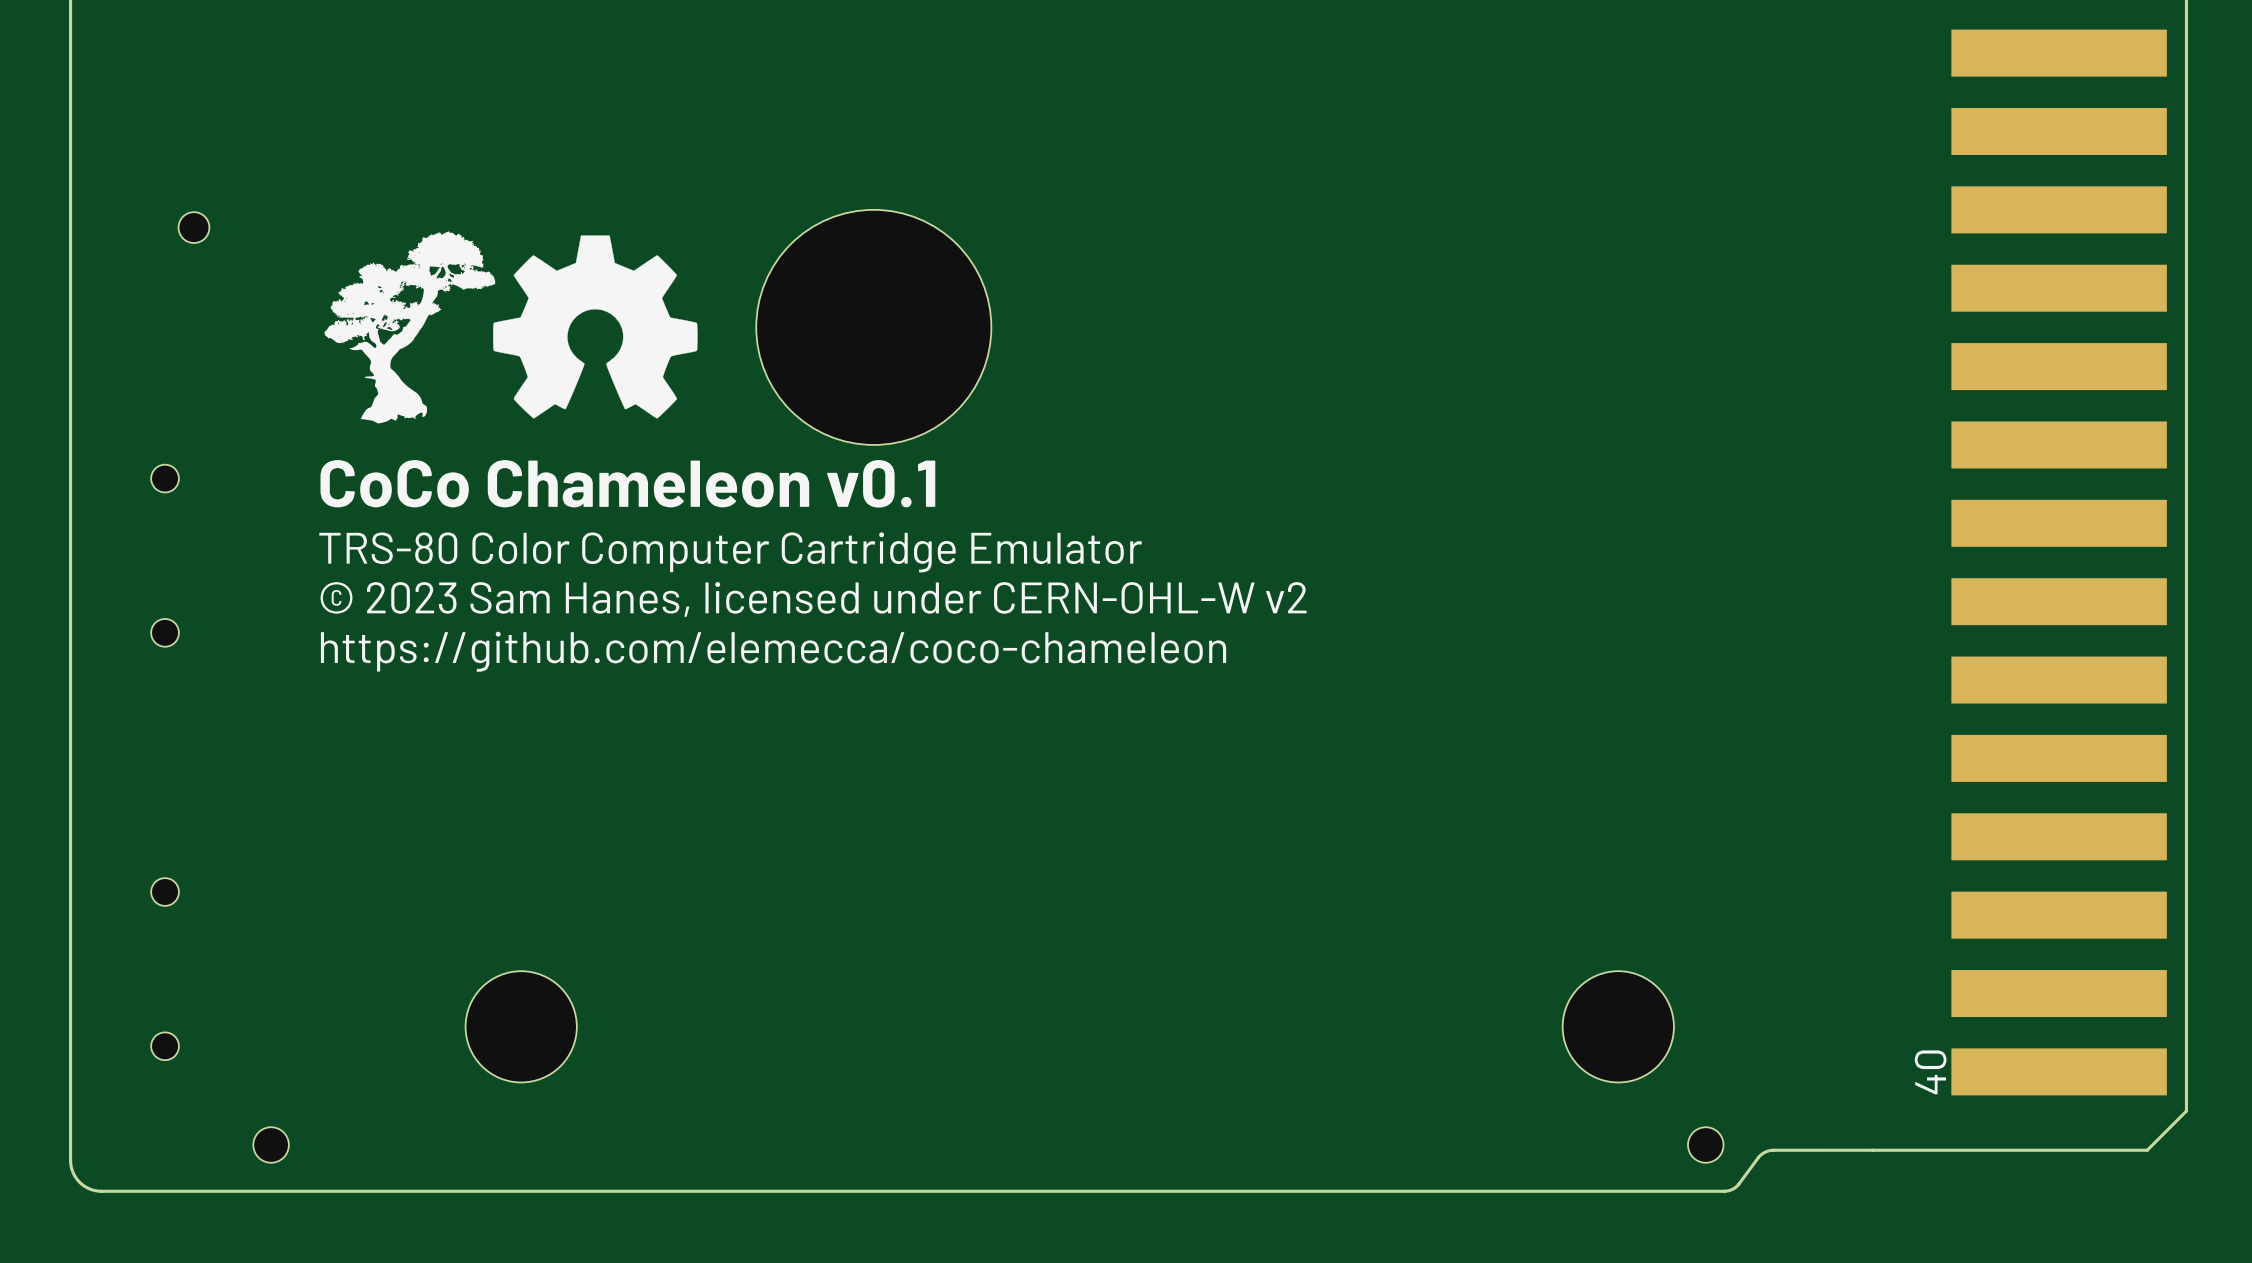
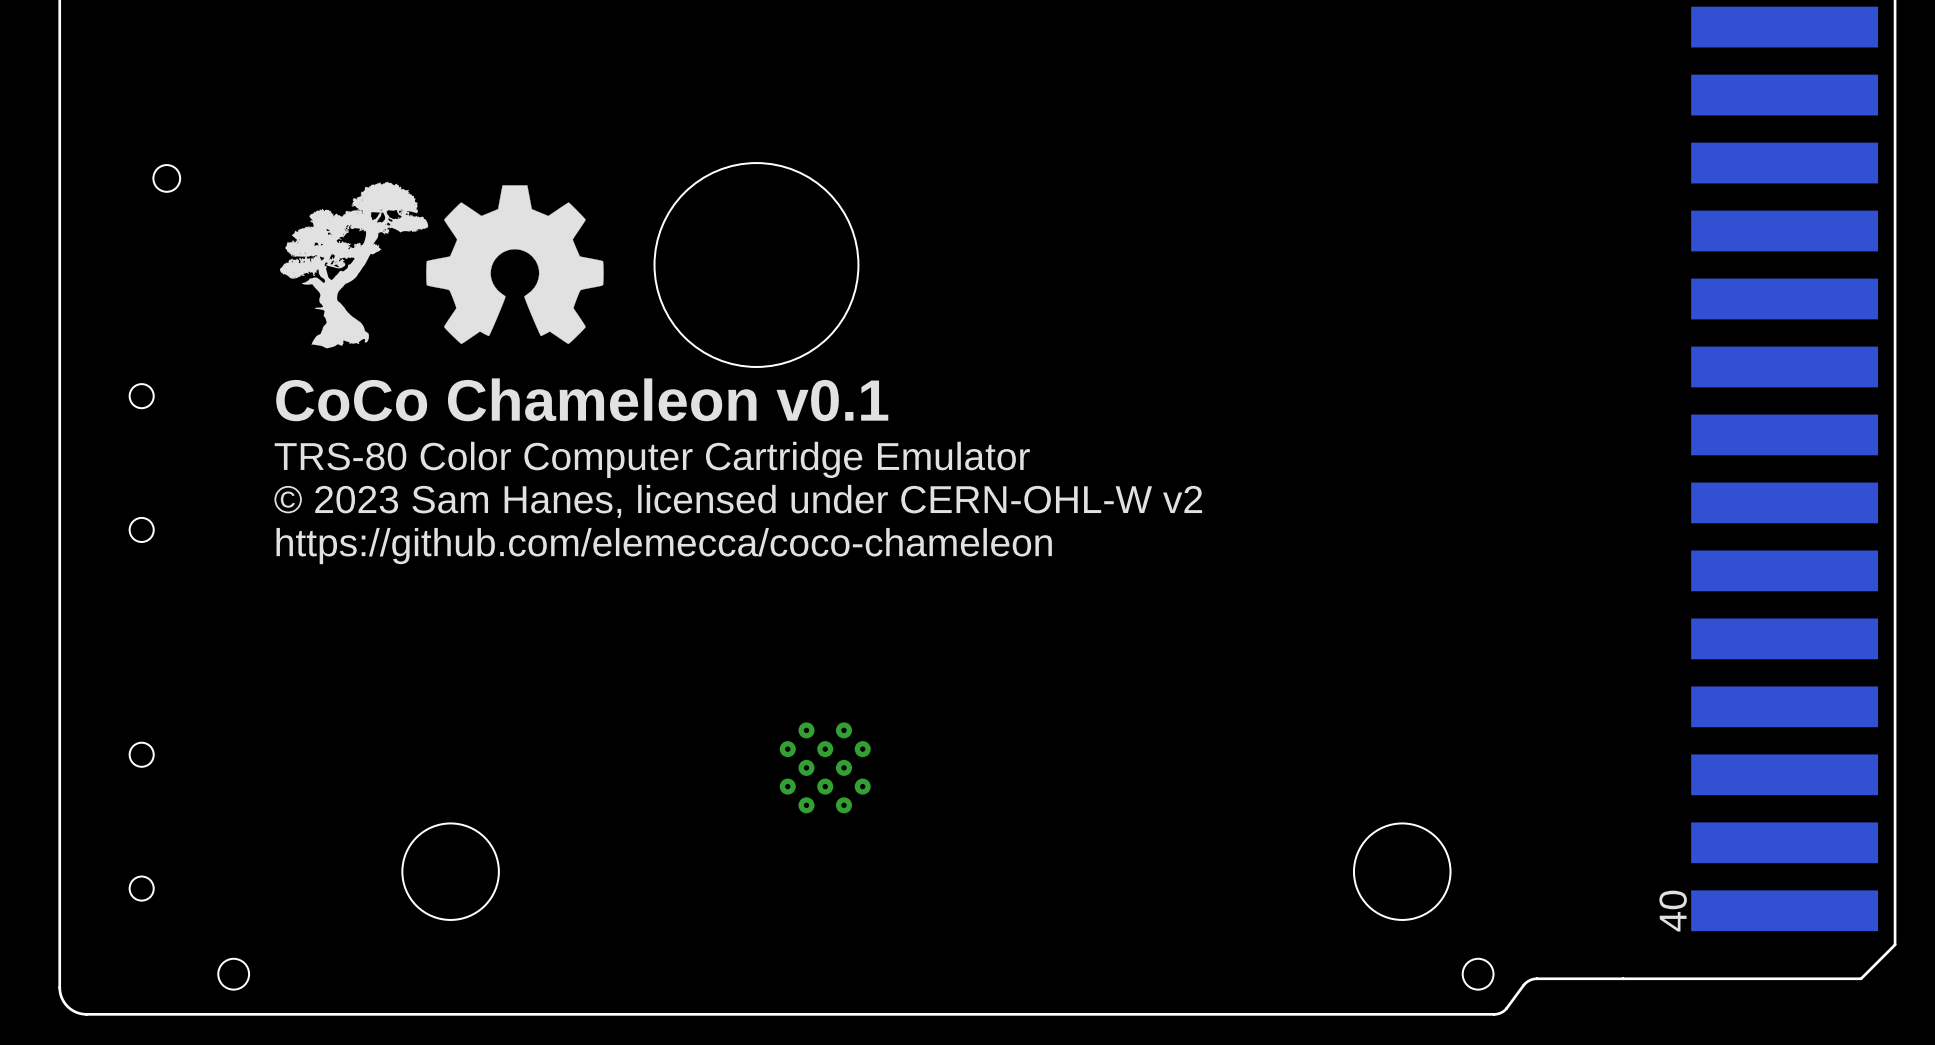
part: none -> (825, 767)

